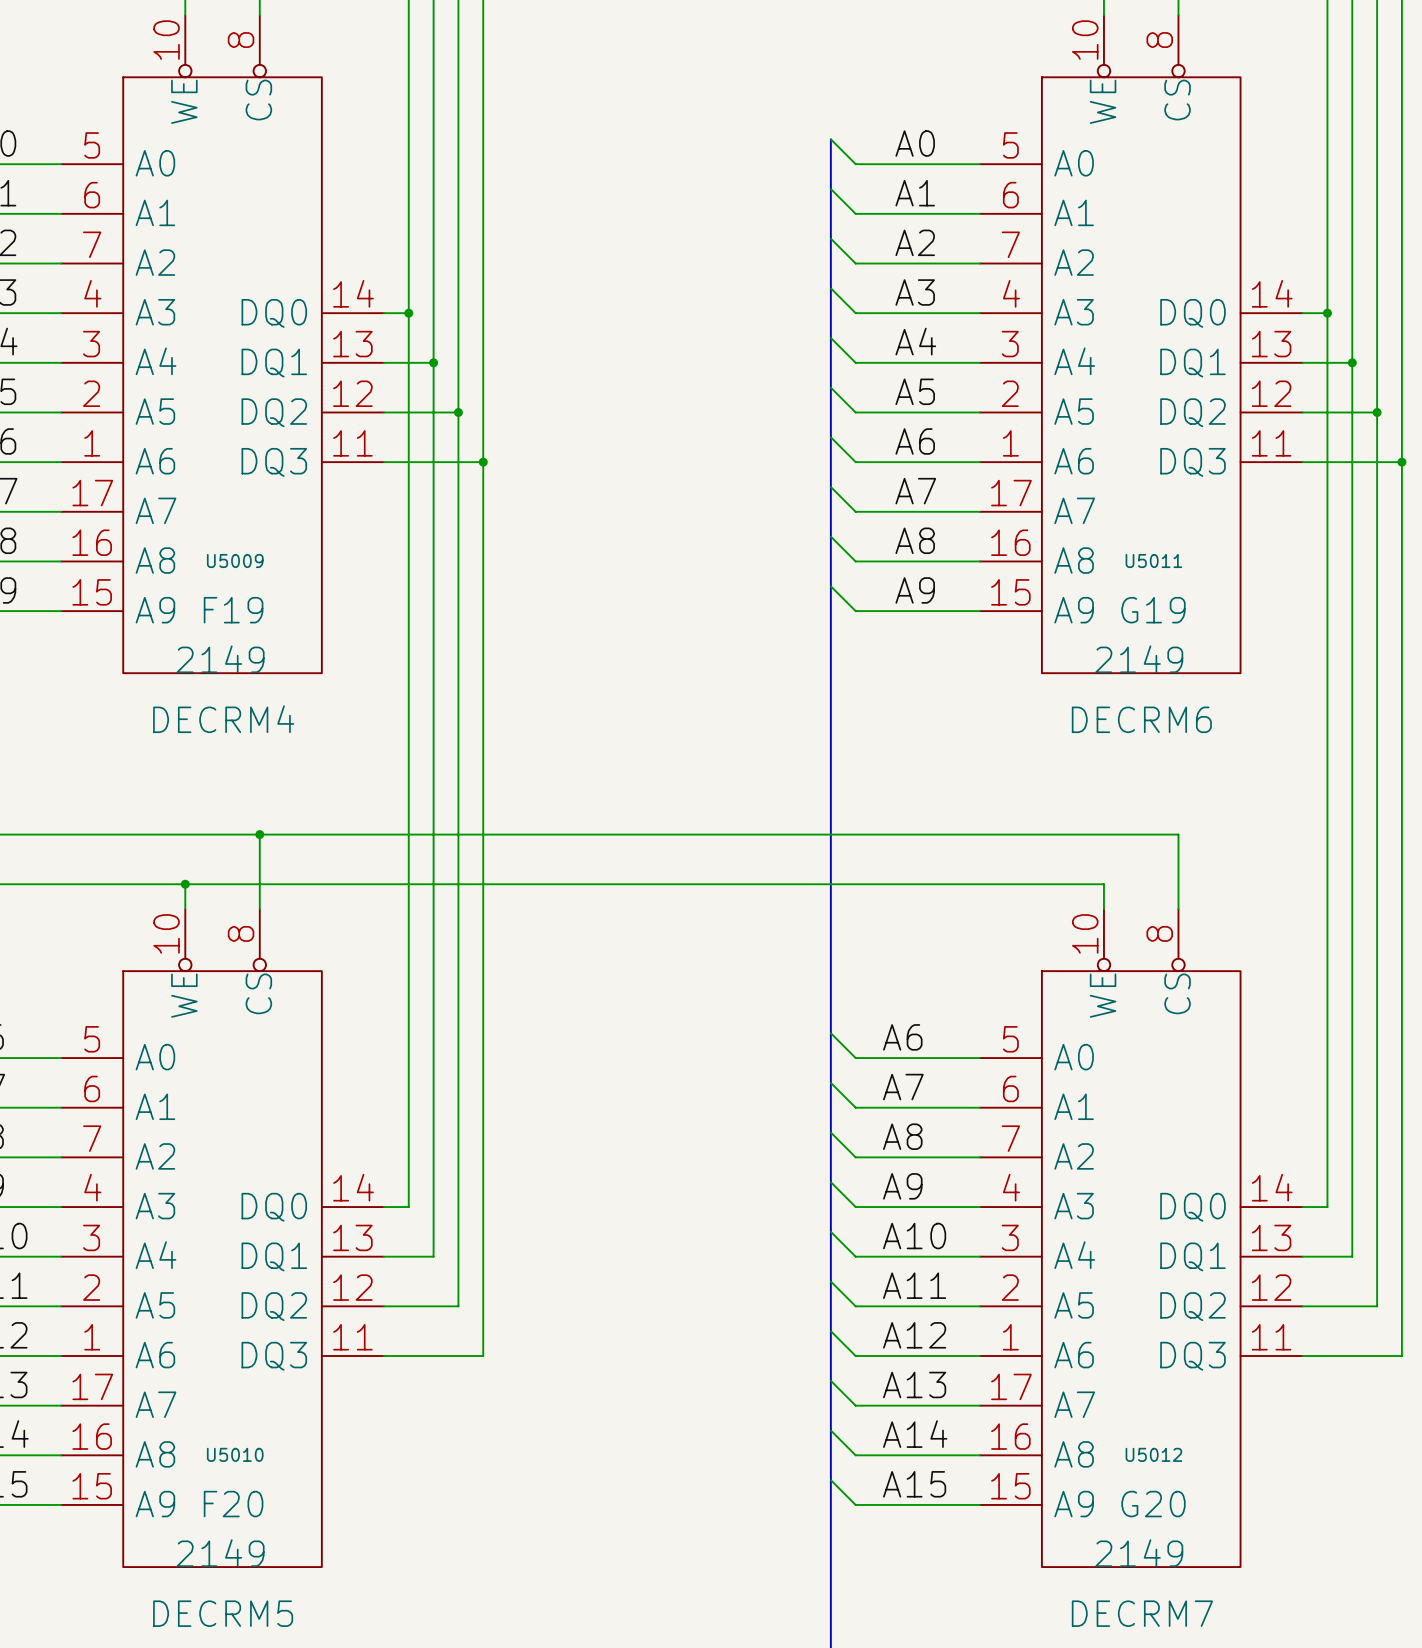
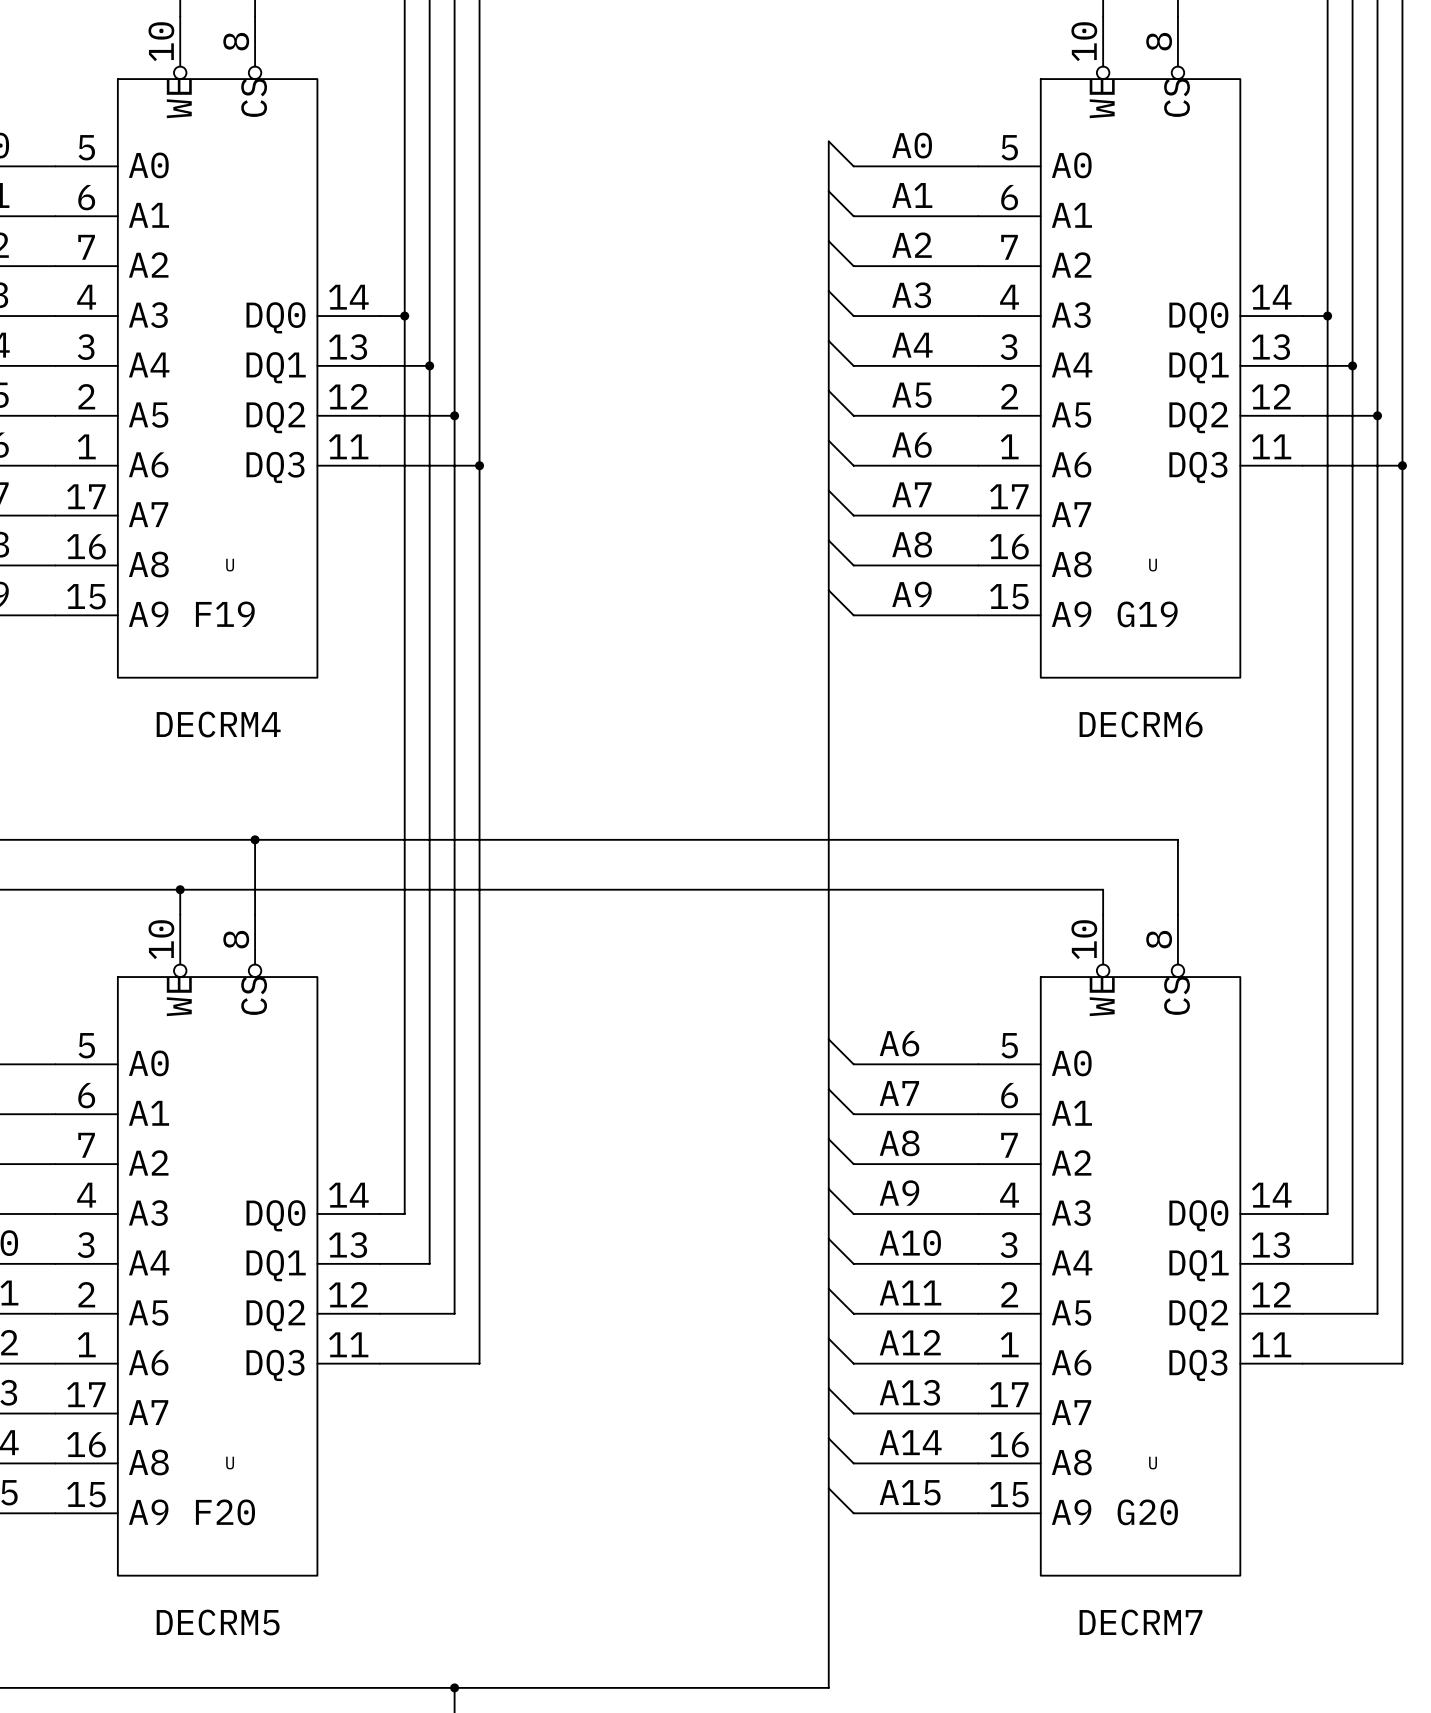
U5009 name: U5009 (235, 560) -> U (230, 565)
U5011 name: U5011 (1153, 560) -> U (1153, 565)
U5009 value: 2149 (220, 659) -> none
U5011 value: 2149 (1139, 659) -> none
U5010 name: U5010 (235, 1454) -> U (230, 1463)
U5012 name: U5012 (1153, 1454) -> U (1153, 1463)
U5010 value: 2149 (220, 1553) -> none
U5012 value: 2149 (1139, 1553) -> none

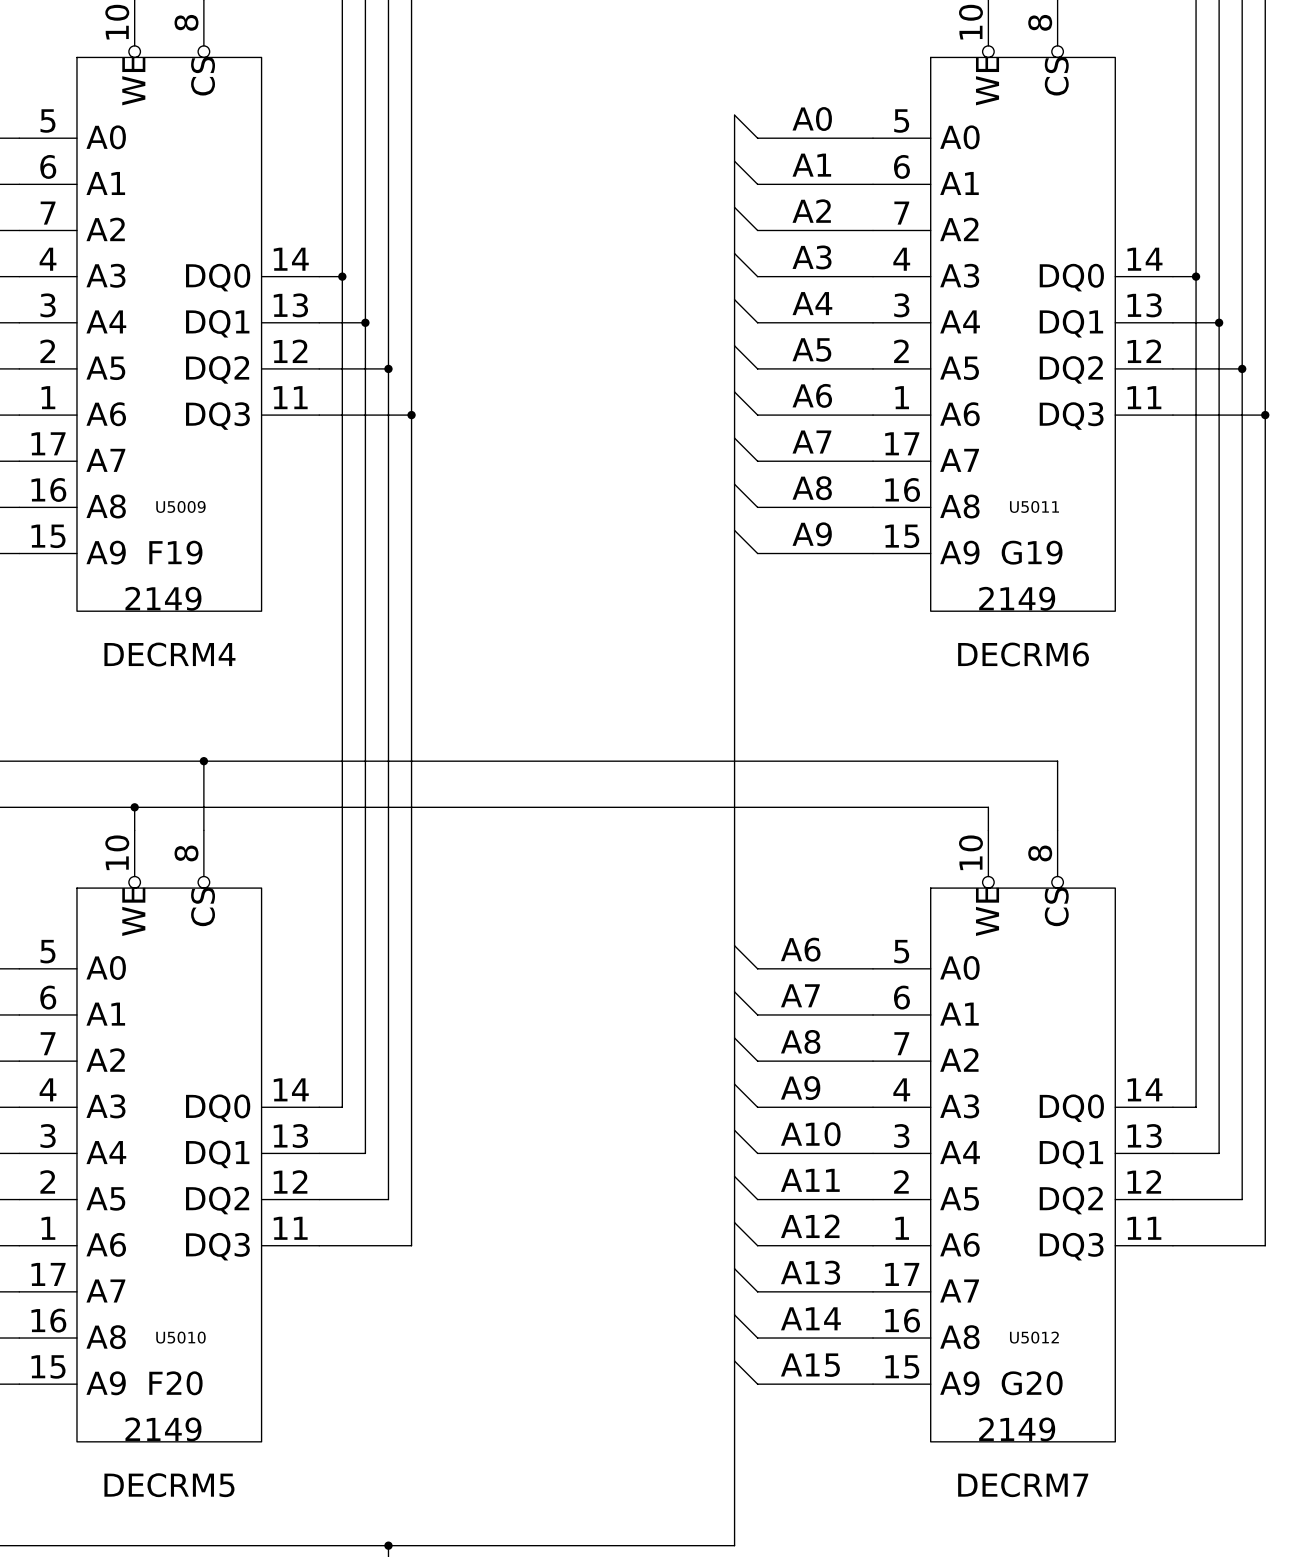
U name: U (230, 565) -> U5009 (180, 506)
U name: U (1153, 565) -> U5011 (1034, 506)
U value: none -> 2149 (163, 598)
U value: none -> 2149 (1017, 598)
U name: U (230, 1463) -> U5010 (180, 1337)
U name: U (1153, 1463) -> U5012 (1034, 1337)
U value: none -> 2149 (163, 1429)
U value: none -> 2149 (1017, 1429)

